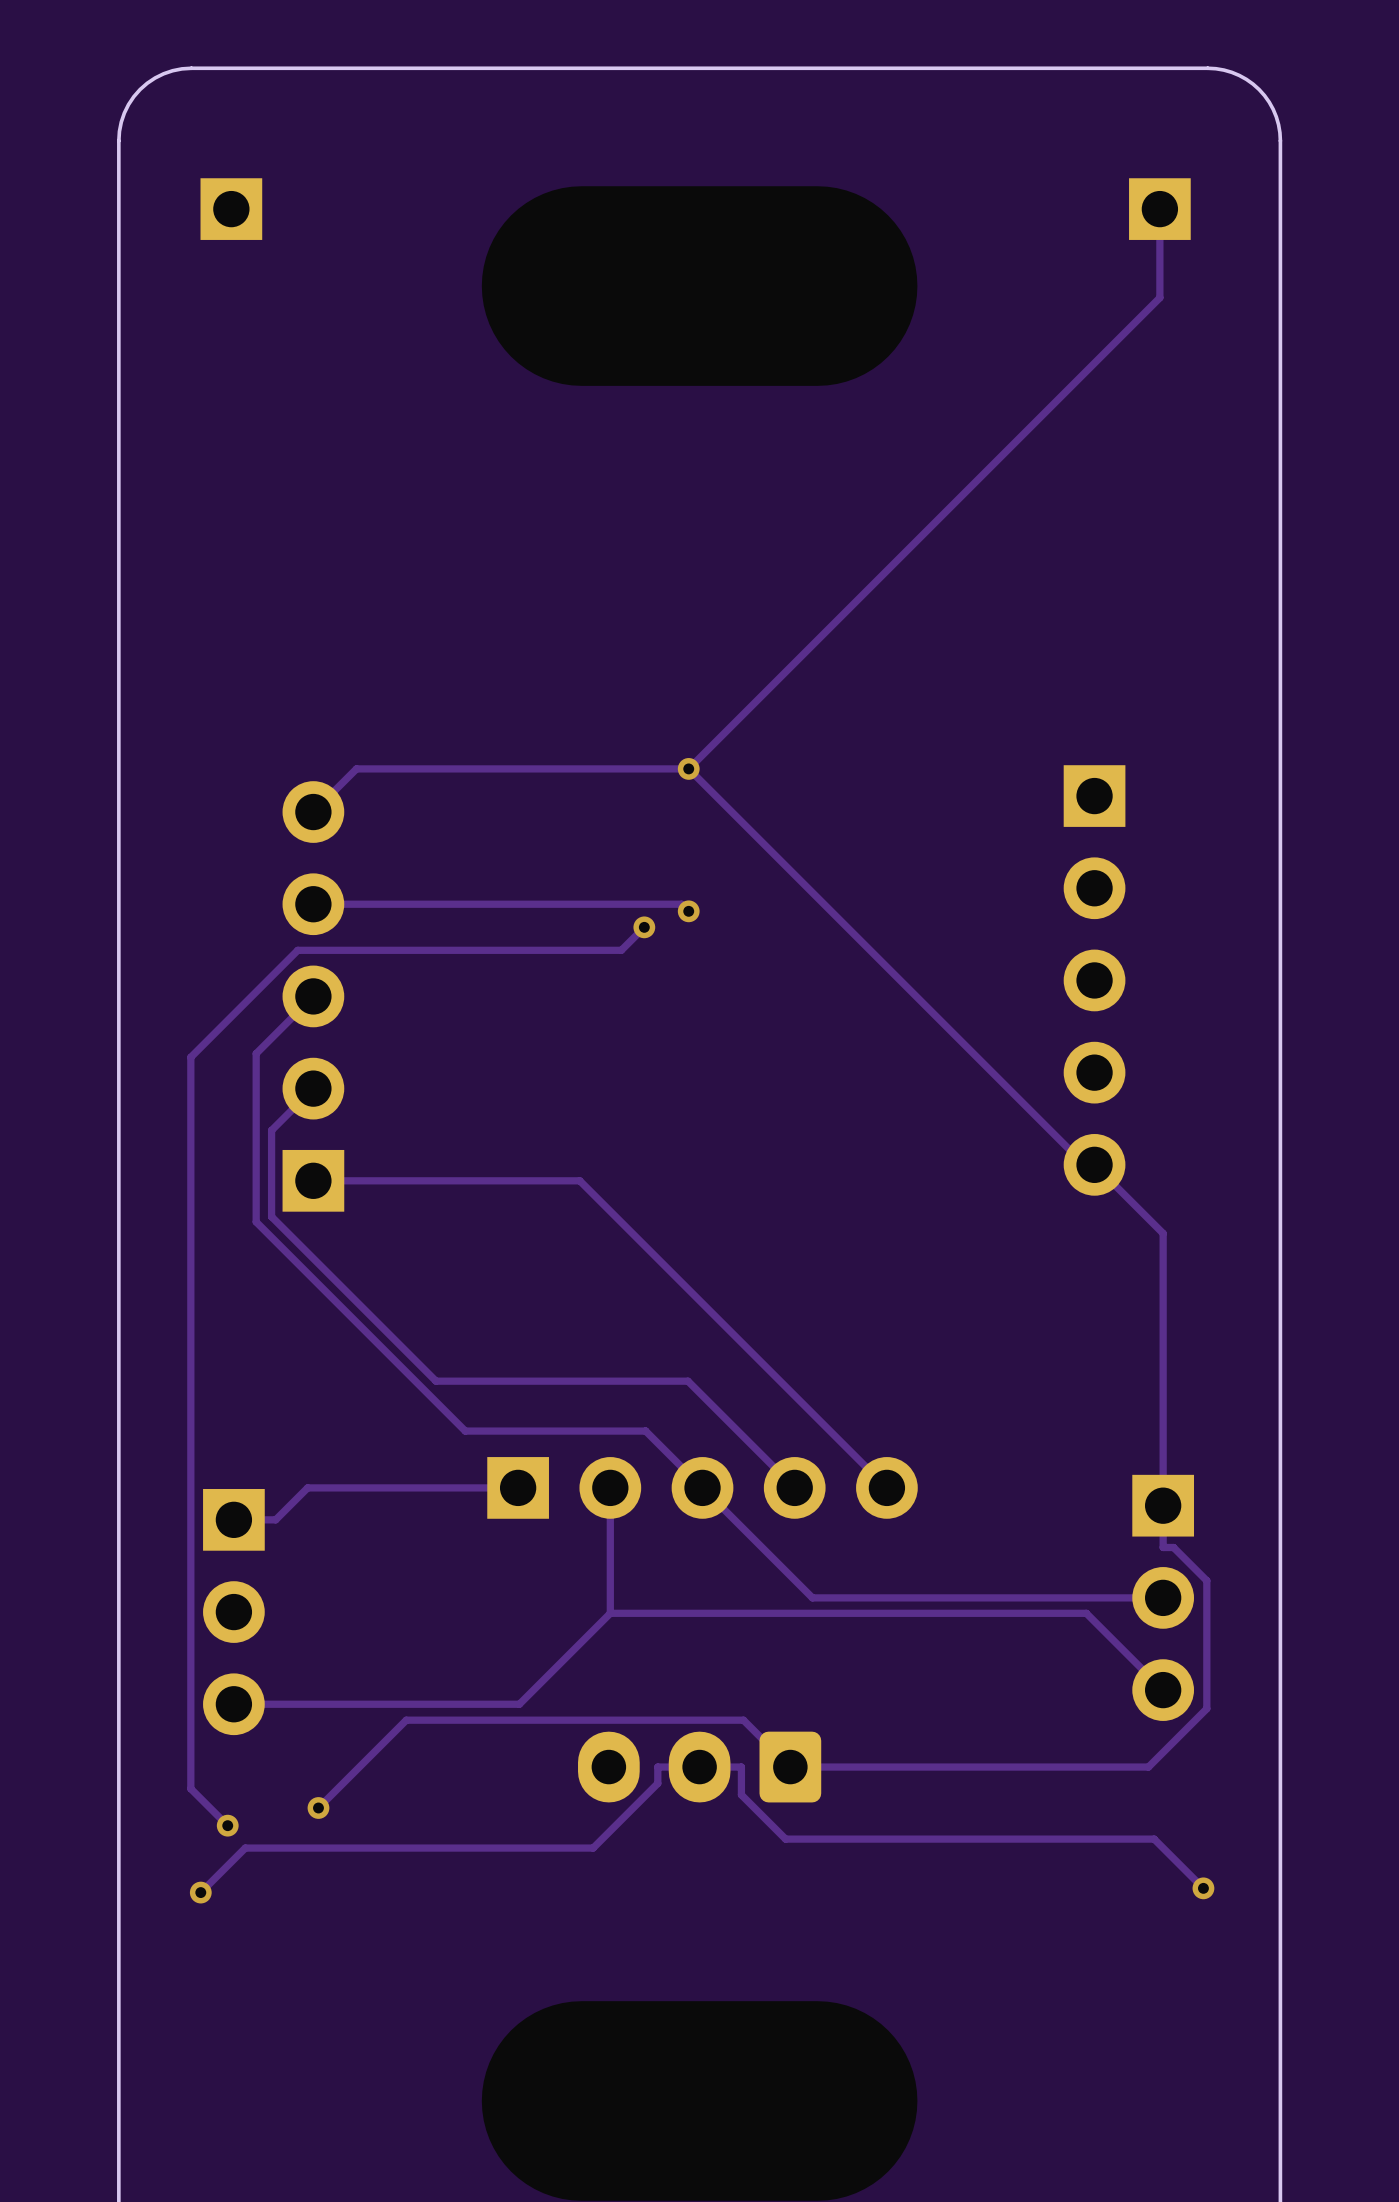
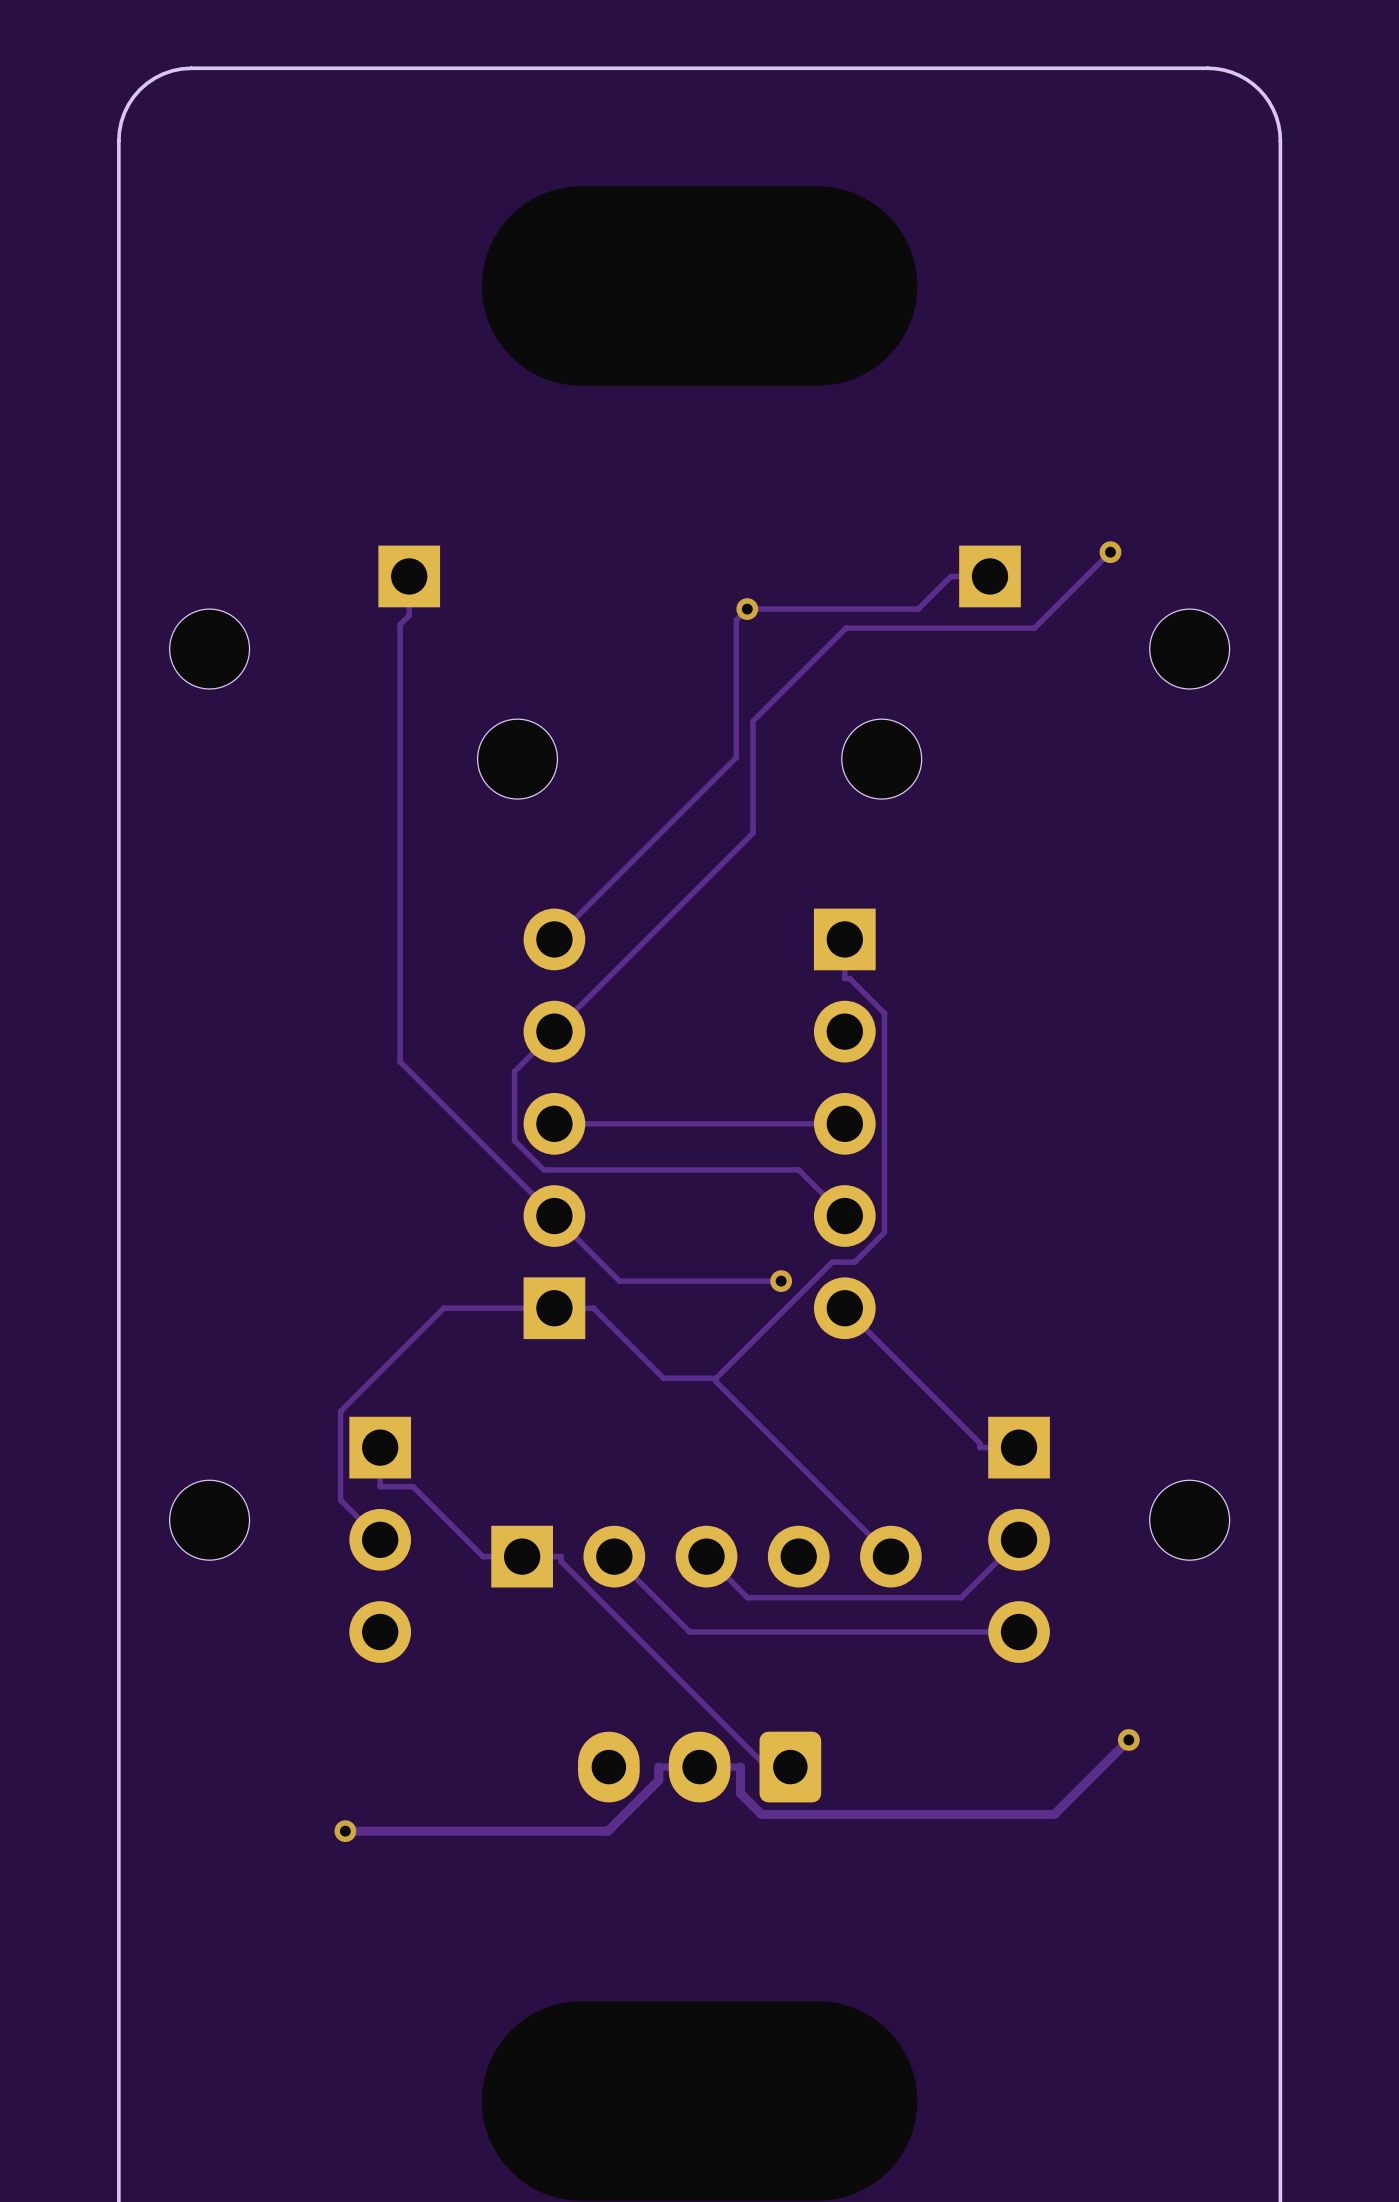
part position: (231, 209) -> (409, 576)
track: (1159, 209) (1159, 297) (688, 768) -> none
part position: (1159, 209) -> (990, 576)
track: none -> (1110, 552) (1034, 628) (845, 628) (753, 721) (753, 833) (514, 1071) (514, 1140) (543, 1169) (798, 1169) (844, 1216)
via: none -> (1110, 552)
track: none -> (409, 576) (409, 615) (400, 624) (400, 1061) (619, 1281) (781, 1281)
track: none -> (990, 576) (950, 576) (918, 609) (747, 609) (736, 620) (736, 757) (554, 939)
via: none -> (747, 609)
part: none -> (209, 649)
part: none -> (1189, 649)
part: none -> (517, 759)
part: none -> (881, 759)
track: (688, 768) (1084, 1164) (1094, 1164) (1163, 1233) (1163, 1547) (1173, 1547) (1206, 1580) (1206, 1708) (1148, 1767) (790, 1767) (743, 1720) (406, 1720) (318, 1808) -> none
track: (688, 768) (356, 768) (313, 812) -> none
via: (688, 768) -> none
track: (313, 904) (681, 904) (688, 911) -> none
via: (688, 911) -> none
track: (644, 927) (621, 950) (297, 950) (190, 1057) (190, 1788) (227, 1825) -> none
via: (644, 927) -> none
track: none -> (844, 939) (844, 978) (849, 978) (884, 1013) (884, 1232) (854, 1262) (832, 1262) (716, 1378)
part: (1094, 980) -> none
track: (313, 996) (256, 1053) (256, 1221) (465, 1431) (645, 1431) (812, 1597) (1163, 1597) -> none
part: (313, 996) -> none
track: (313, 1088) (271, 1130) (271, 1216) (436, 1381) (687, 1381) (794, 1487) -> none
part: none -> (554, 1123)
track: none -> (844, 1123) (554, 1123)
part: none -> (844, 1123)
track: (313, 1180) (579, 1180) (886, 1487) -> none
via: none -> (781, 1281)
track: none -> (844, 1308) (979, 1443) (979, 1447) (1019, 1447)
track: none -> (716, 1378) (716, 1381) (890, 1556)
track: none -> (716, 1378) (663, 1378) (593, 1308) (443, 1308) (340, 1411) (340, 1500) (380, 1539)
track: none -> (380, 1447) (380, 1486) (413, 1486) (483, 1556) (561, 1556) (561, 1561) (766, 1767) (790, 1767)
track: (518, 1487) (307, 1487) (275, 1519) (233, 1519) -> none
track: (610, 1487) (610, 1613) -> none
part position: (702, 1487) -> (706, 1556)
part: none -> (209, 1520)
part: none -> (1189, 1520)
track: none -> (1019, 1539) (961, 1597) (747, 1597) (706, 1556)
track: none -> (614, 1556) (689, 1632) (1019, 1632)
part position: (1163, 1597) -> (1019, 1539)
part position: (233, 1612) -> (380, 1539)
track: (610, 1613) (1086, 1613) (1163, 1690) -> none
track: (610, 1613) (519, 1704) (233, 1704) -> none
track: (658, 1767) (657, 1783) (593, 1848) (245, 1848) (200, 1892) -> (658, 1767) (658, 1780) (608, 1831) (345, 1831)
track: (740, 1767) (741, 1794) (785, 1839) (1154, 1839) (1203, 1888) -> (740, 1767) (740, 1793) (761, 1814) (1054, 1814) (1128, 1739)
via position: (318, 1808) -> (345, 1831)
via: (227, 1825) -> none
via position: (1203, 1888) -> (1128, 1739)
via: (200, 1892) -> none

